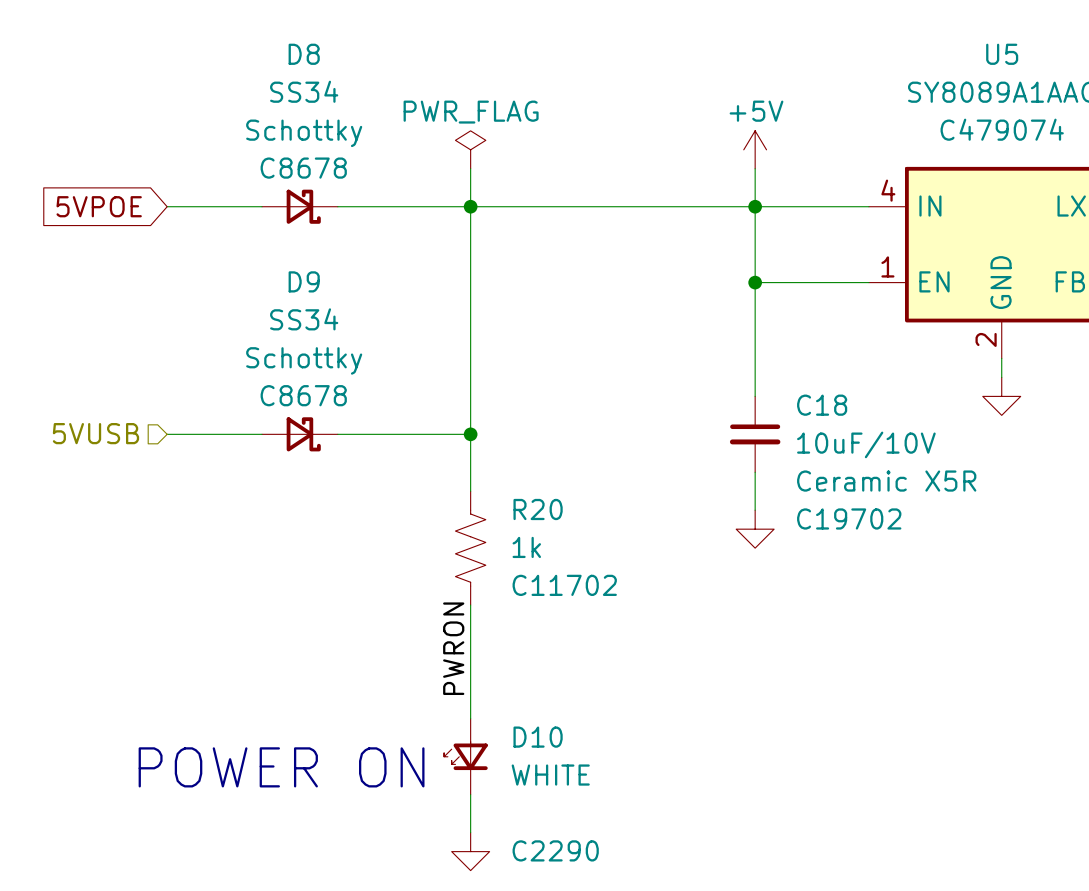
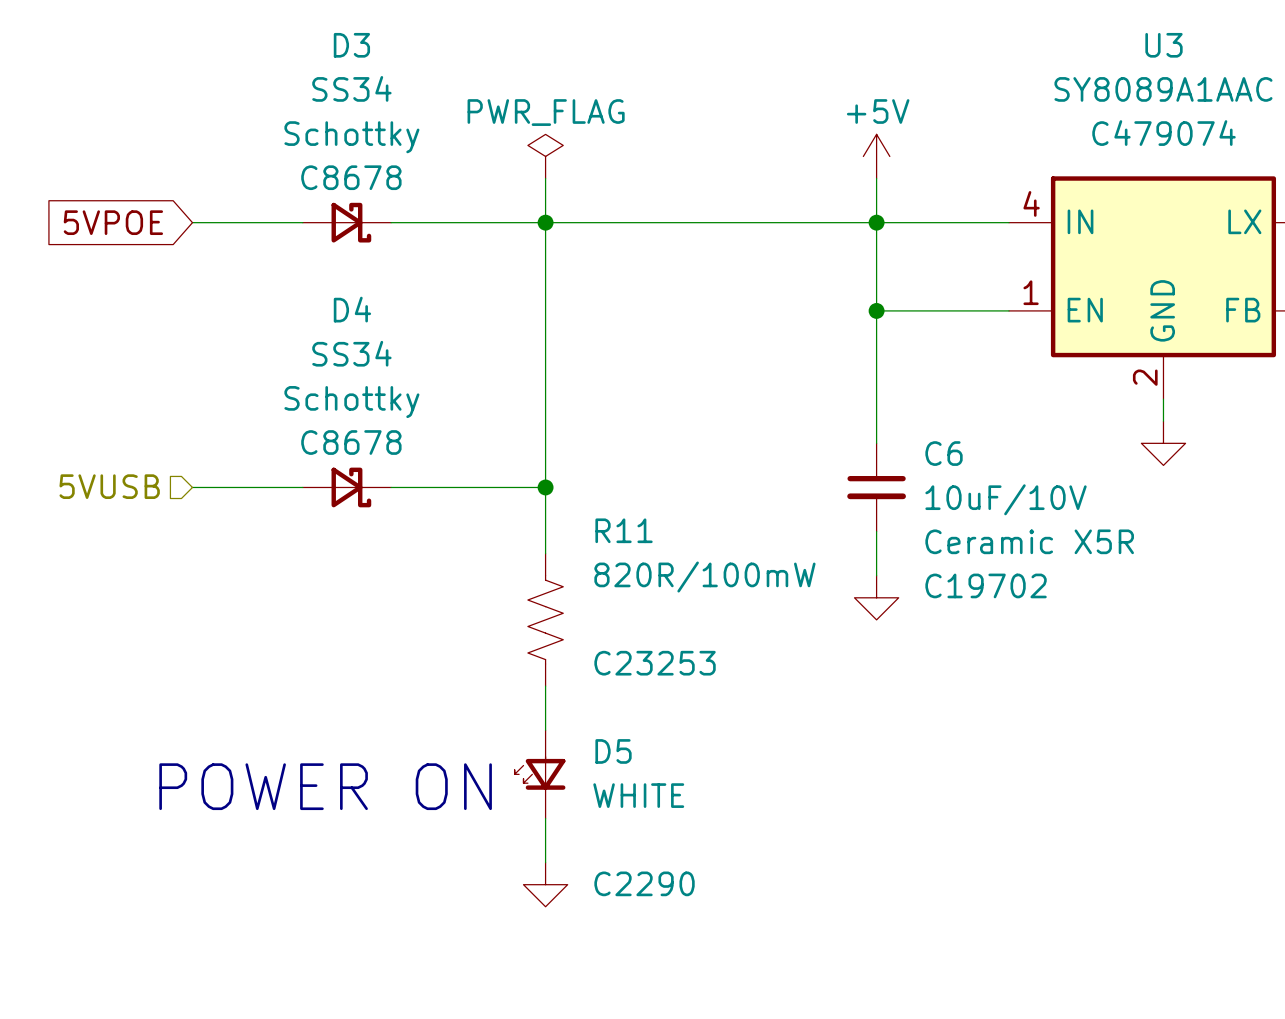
D8 name: D8 (304, 54) -> D3 (351, 45)
U5 name: U5 (1002, 54) -> U3 (1164, 45)
D9 name: D9 (304, 281) -> D4 (352, 309)
C18 name: C18 (822, 405) -> C6 (944, 453)
R20 name: R20 (538, 509) -> R11 (624, 530)
R20 value: 1k (526, 547) -> 820R/100mW (704, 577)
R20 text: C11702 (564, 585) -> C23253 (655, 663)
label: PWRON (453, 648) -> none
D5: none -> WHITE (540, 774)
D10: WHITE (465, 756) -> none
text position: POWER ON (281, 767) -> POWER ON (325, 786)
wire: (470, 794) (470, 832) -> none
power symbol position: (470, 851) -> (545, 884)

